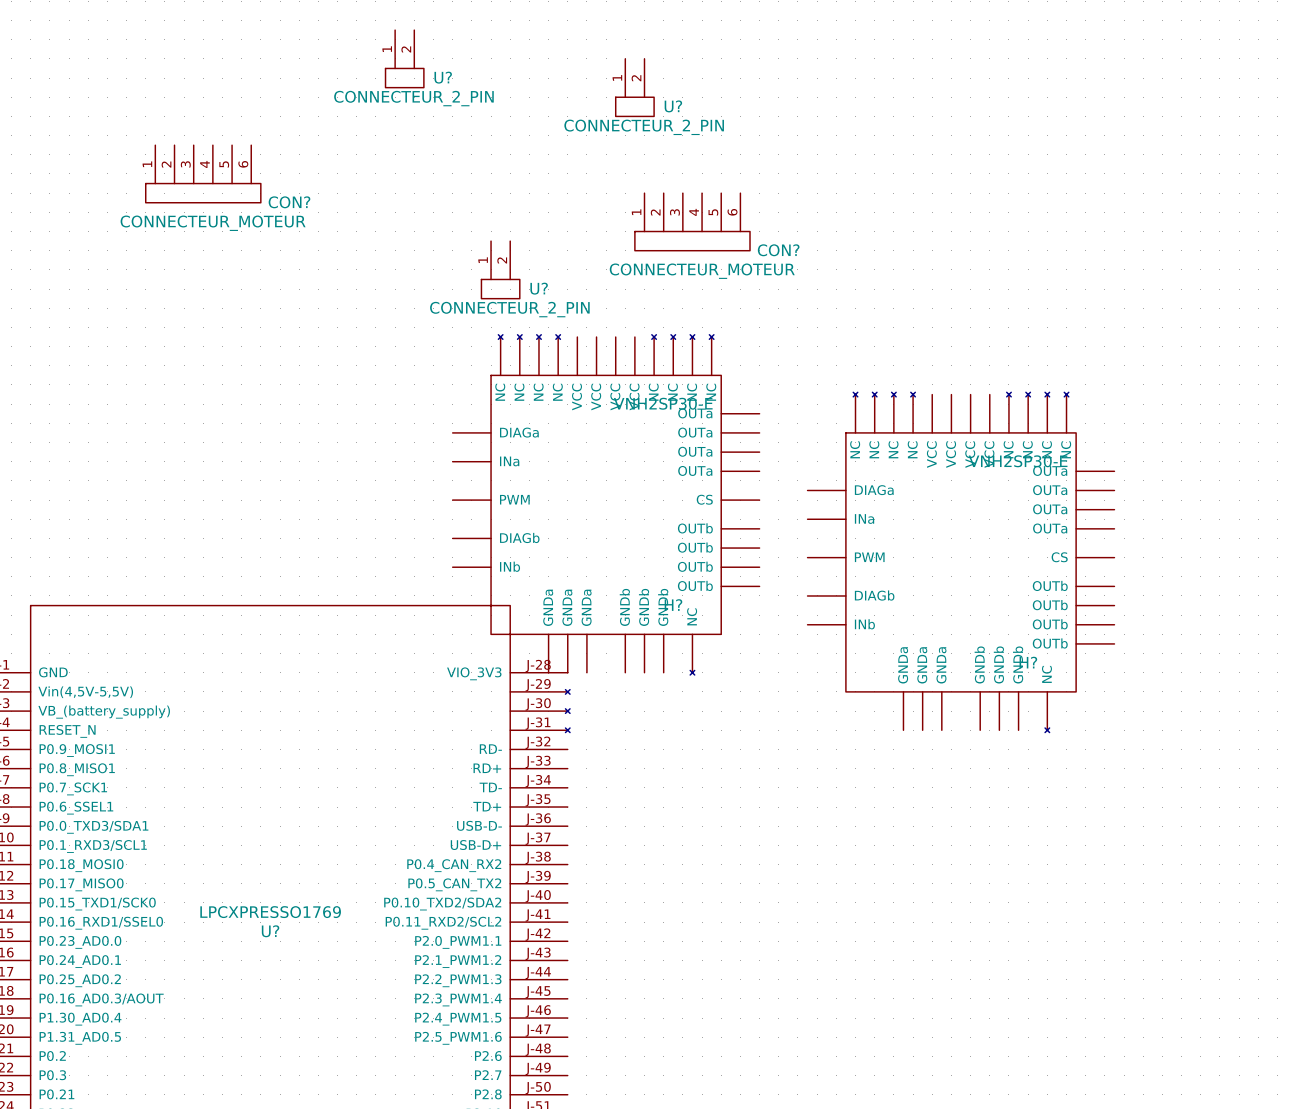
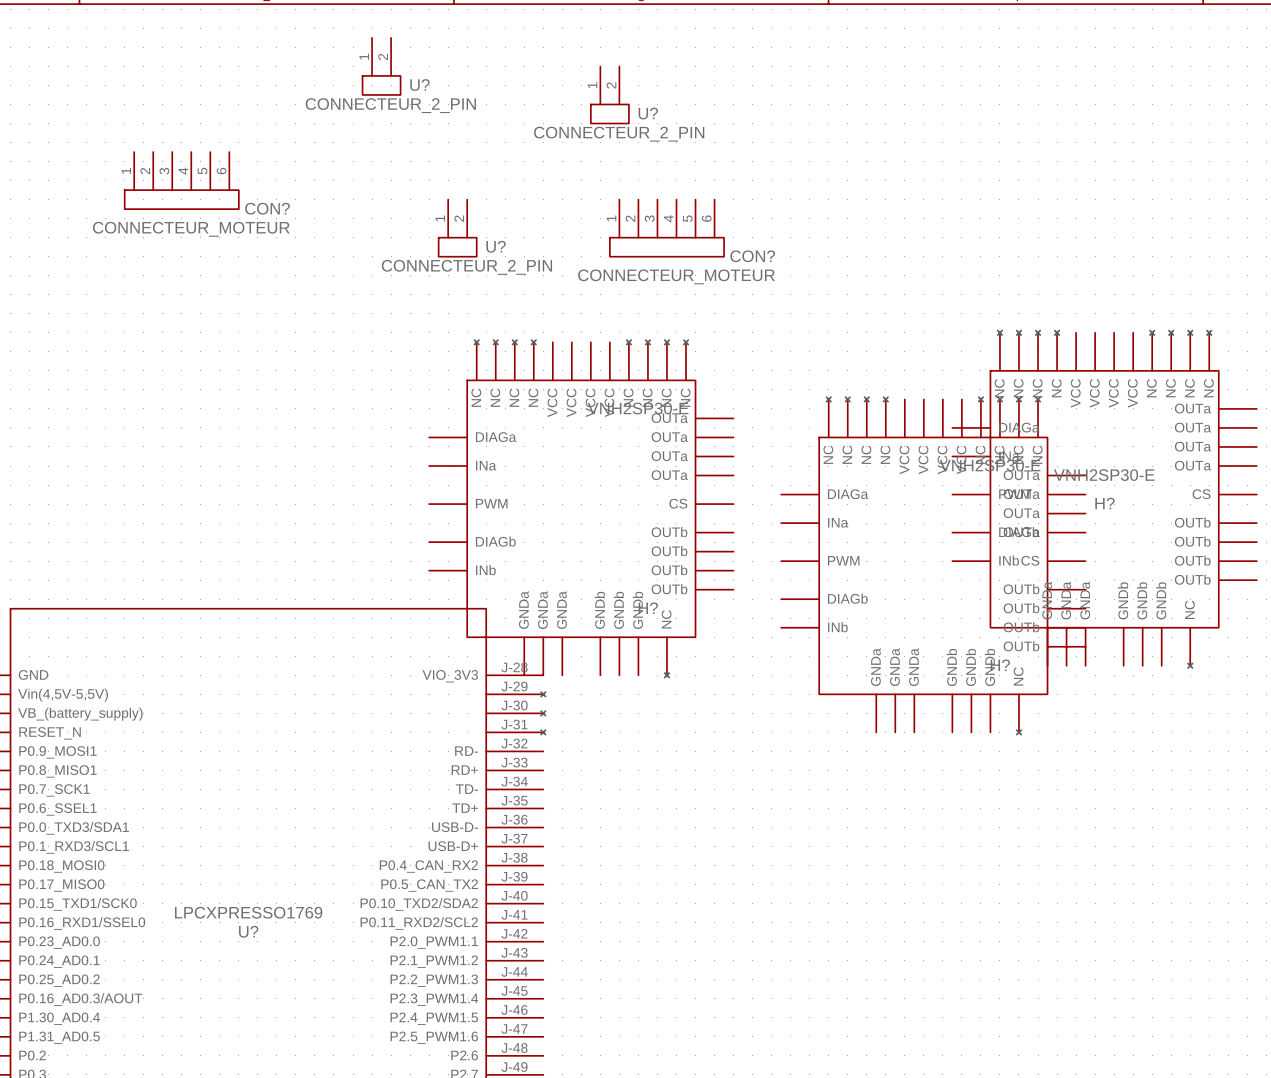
U? position: (500, 269) -> (457, 228)
H?: none -> VNH2SP30-E (1104, 499)

